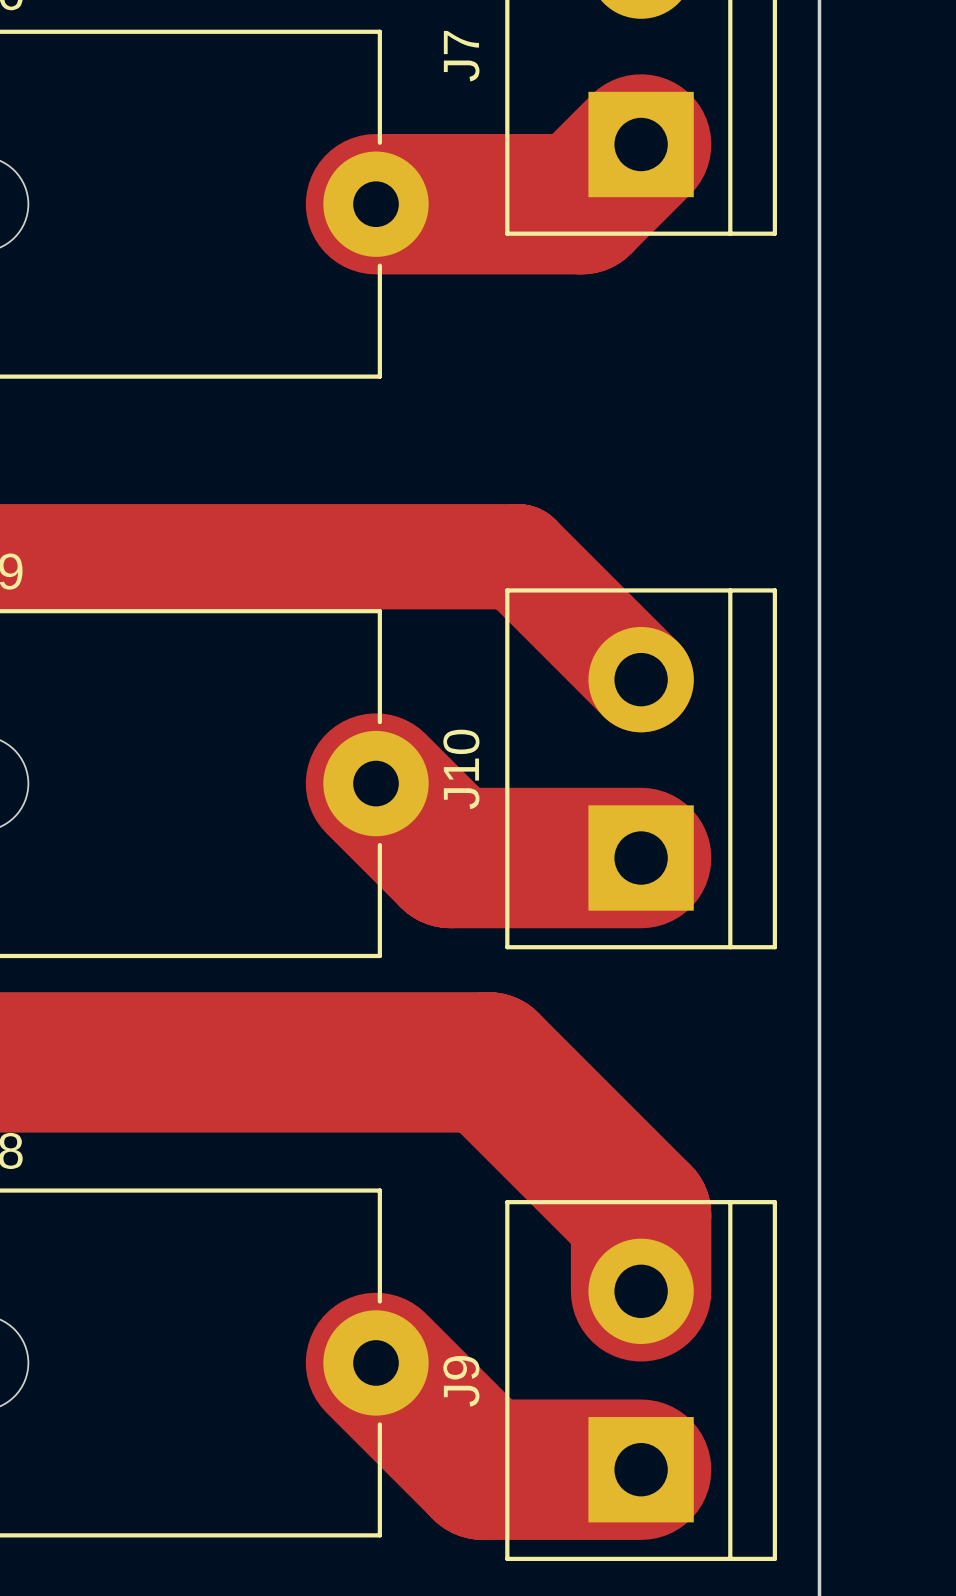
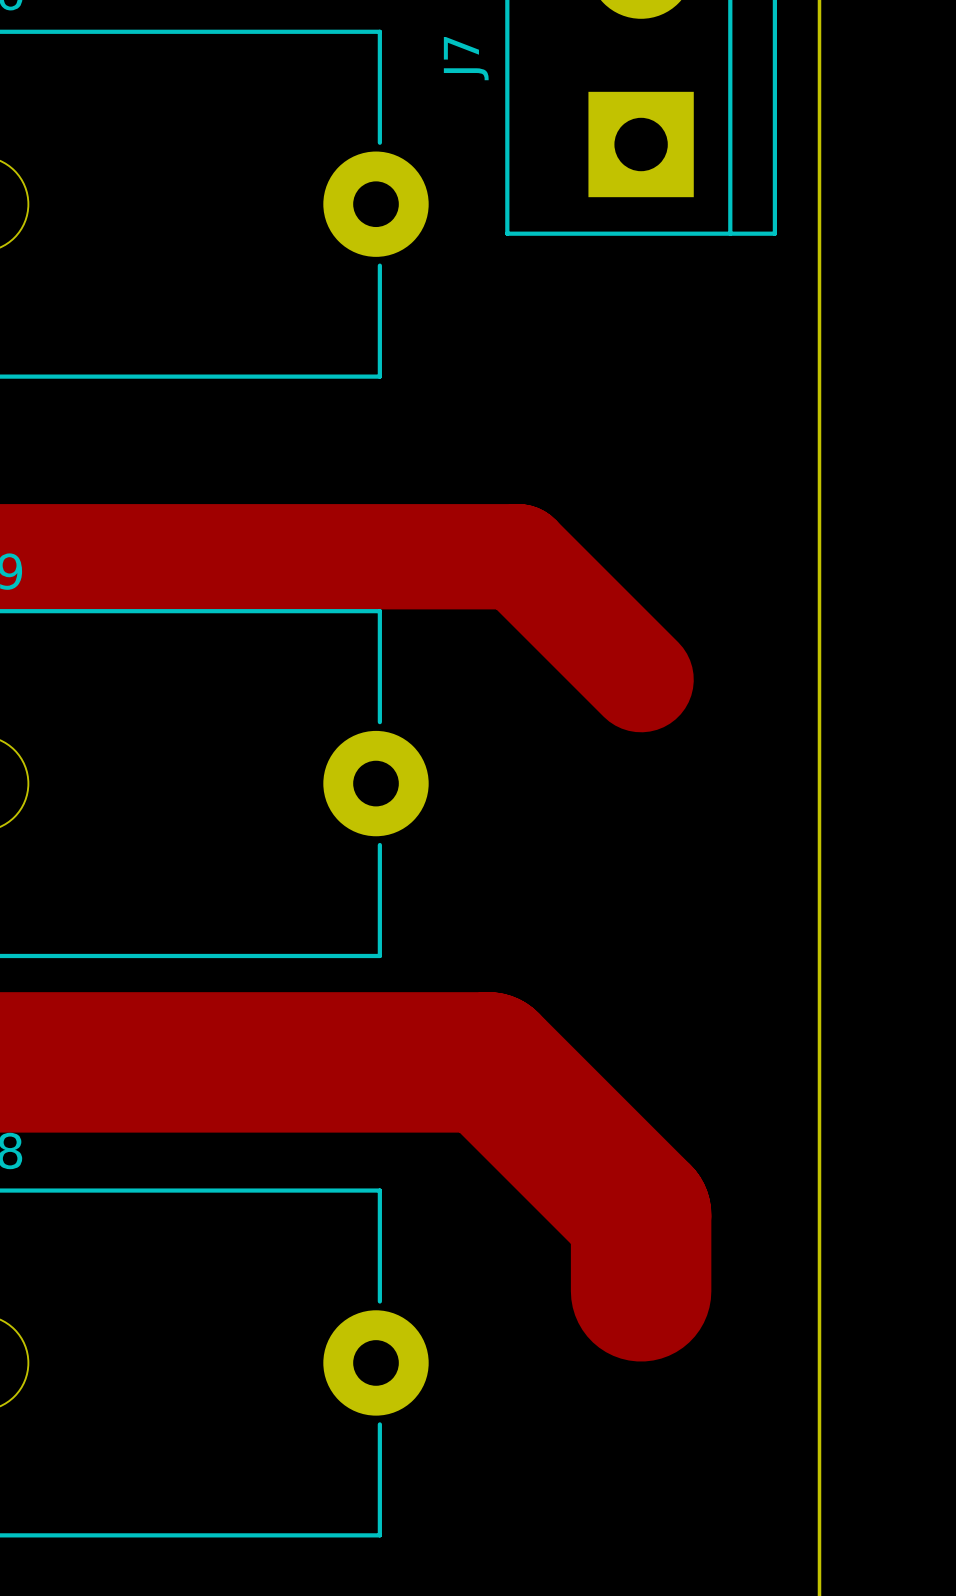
top track: (641, 144) (581, 204) (376, 204) -> none
J10: (641, 768) -> none
top track: (376, 783) (450, 858) (641, 858) -> none
top track: (376, 1362) (482, 1469) (641, 1469) -> none
J9: (641, 1380) -> none

